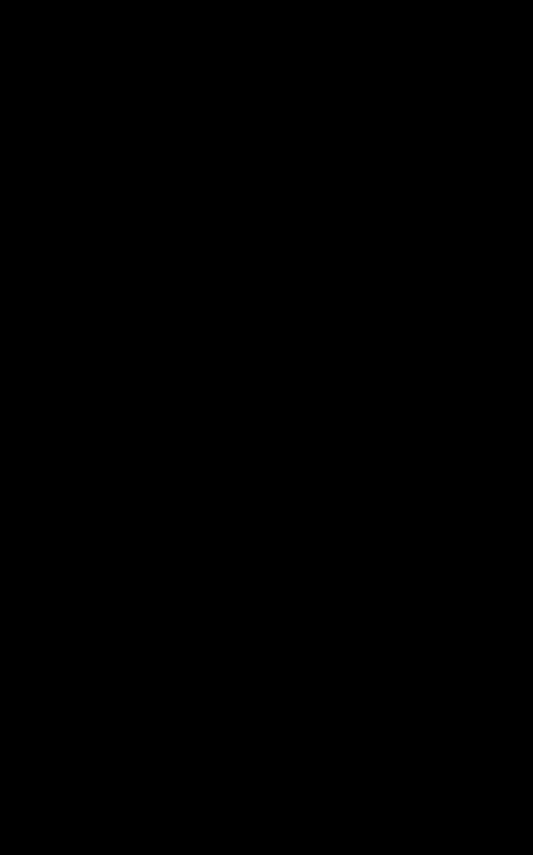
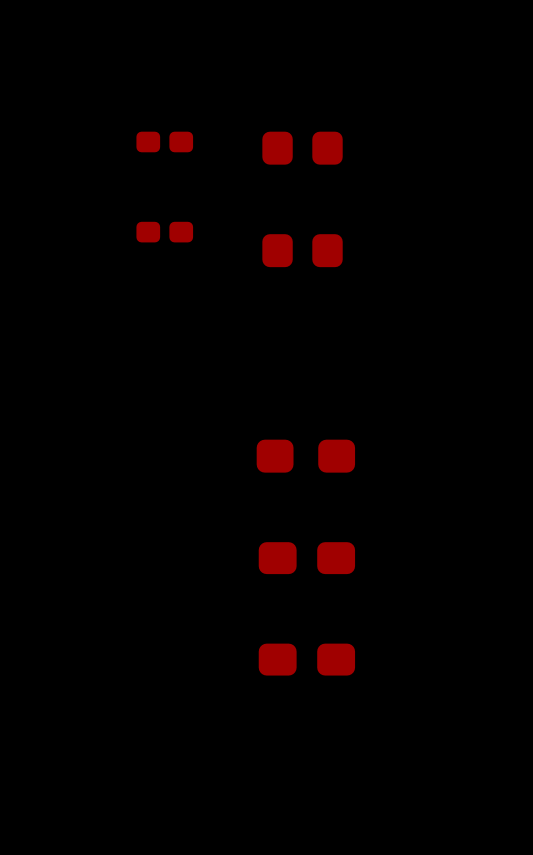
part: none -> (164, 141)
part: none -> (302, 148)
part: none -> (164, 232)
part: none -> (302, 250)
part: none -> (305, 456)
part: none -> (306, 558)
part: none -> (306, 659)

